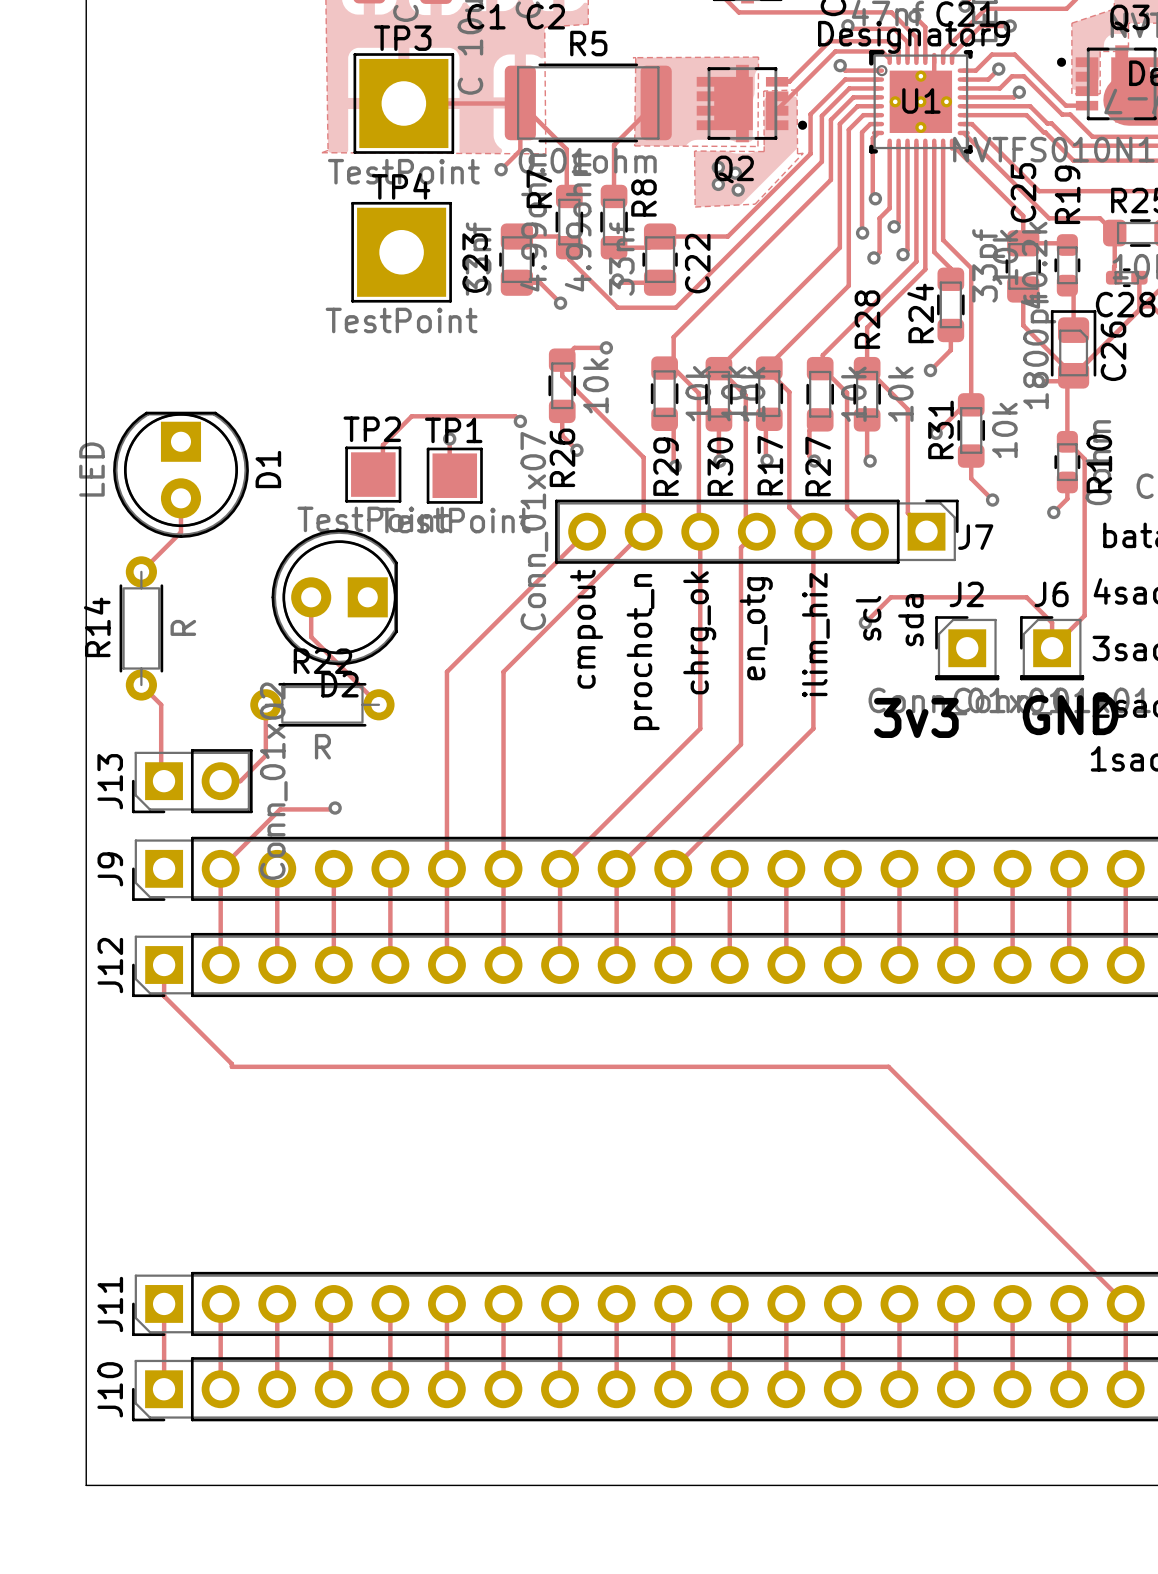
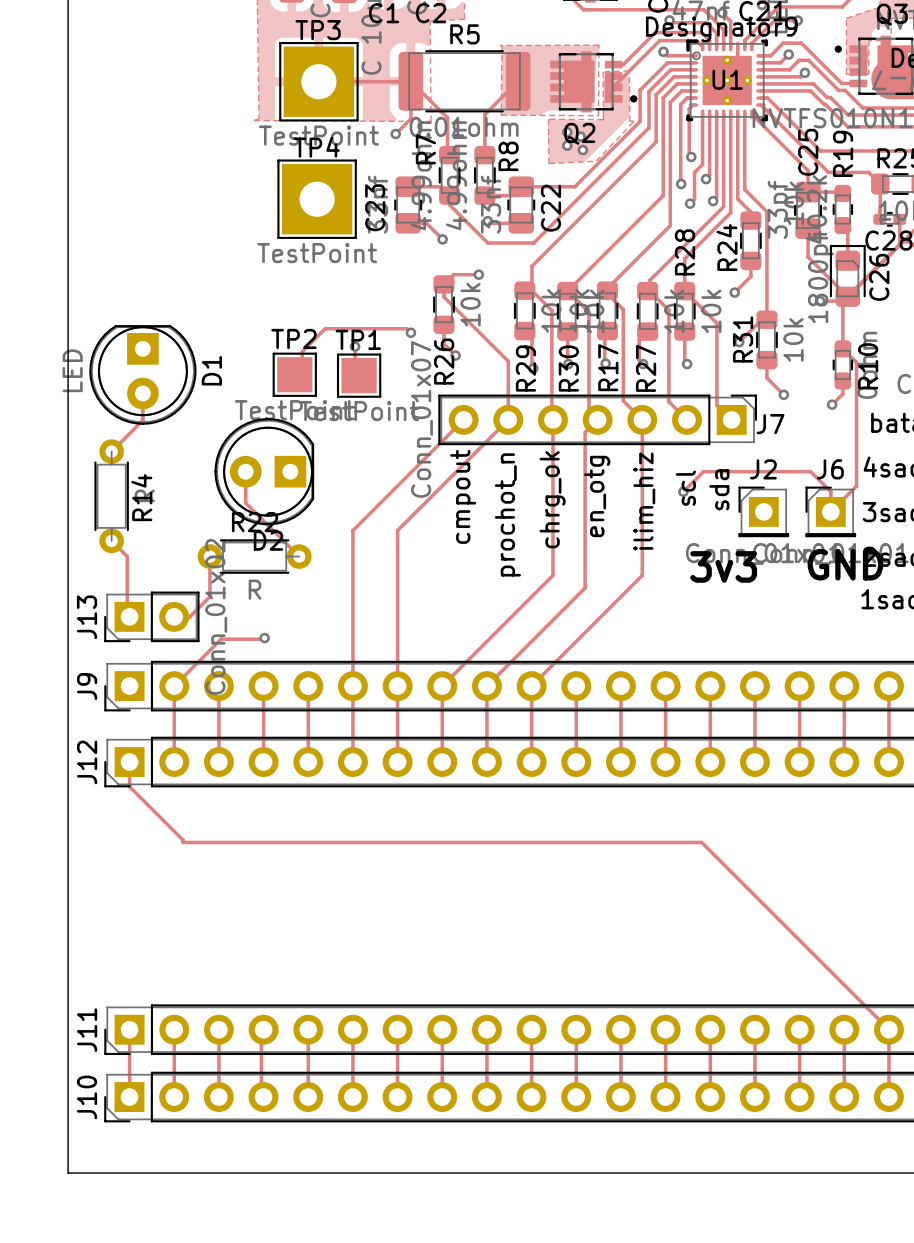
R14 name position: R14 (97, 627) -> R14 (141, 497)

